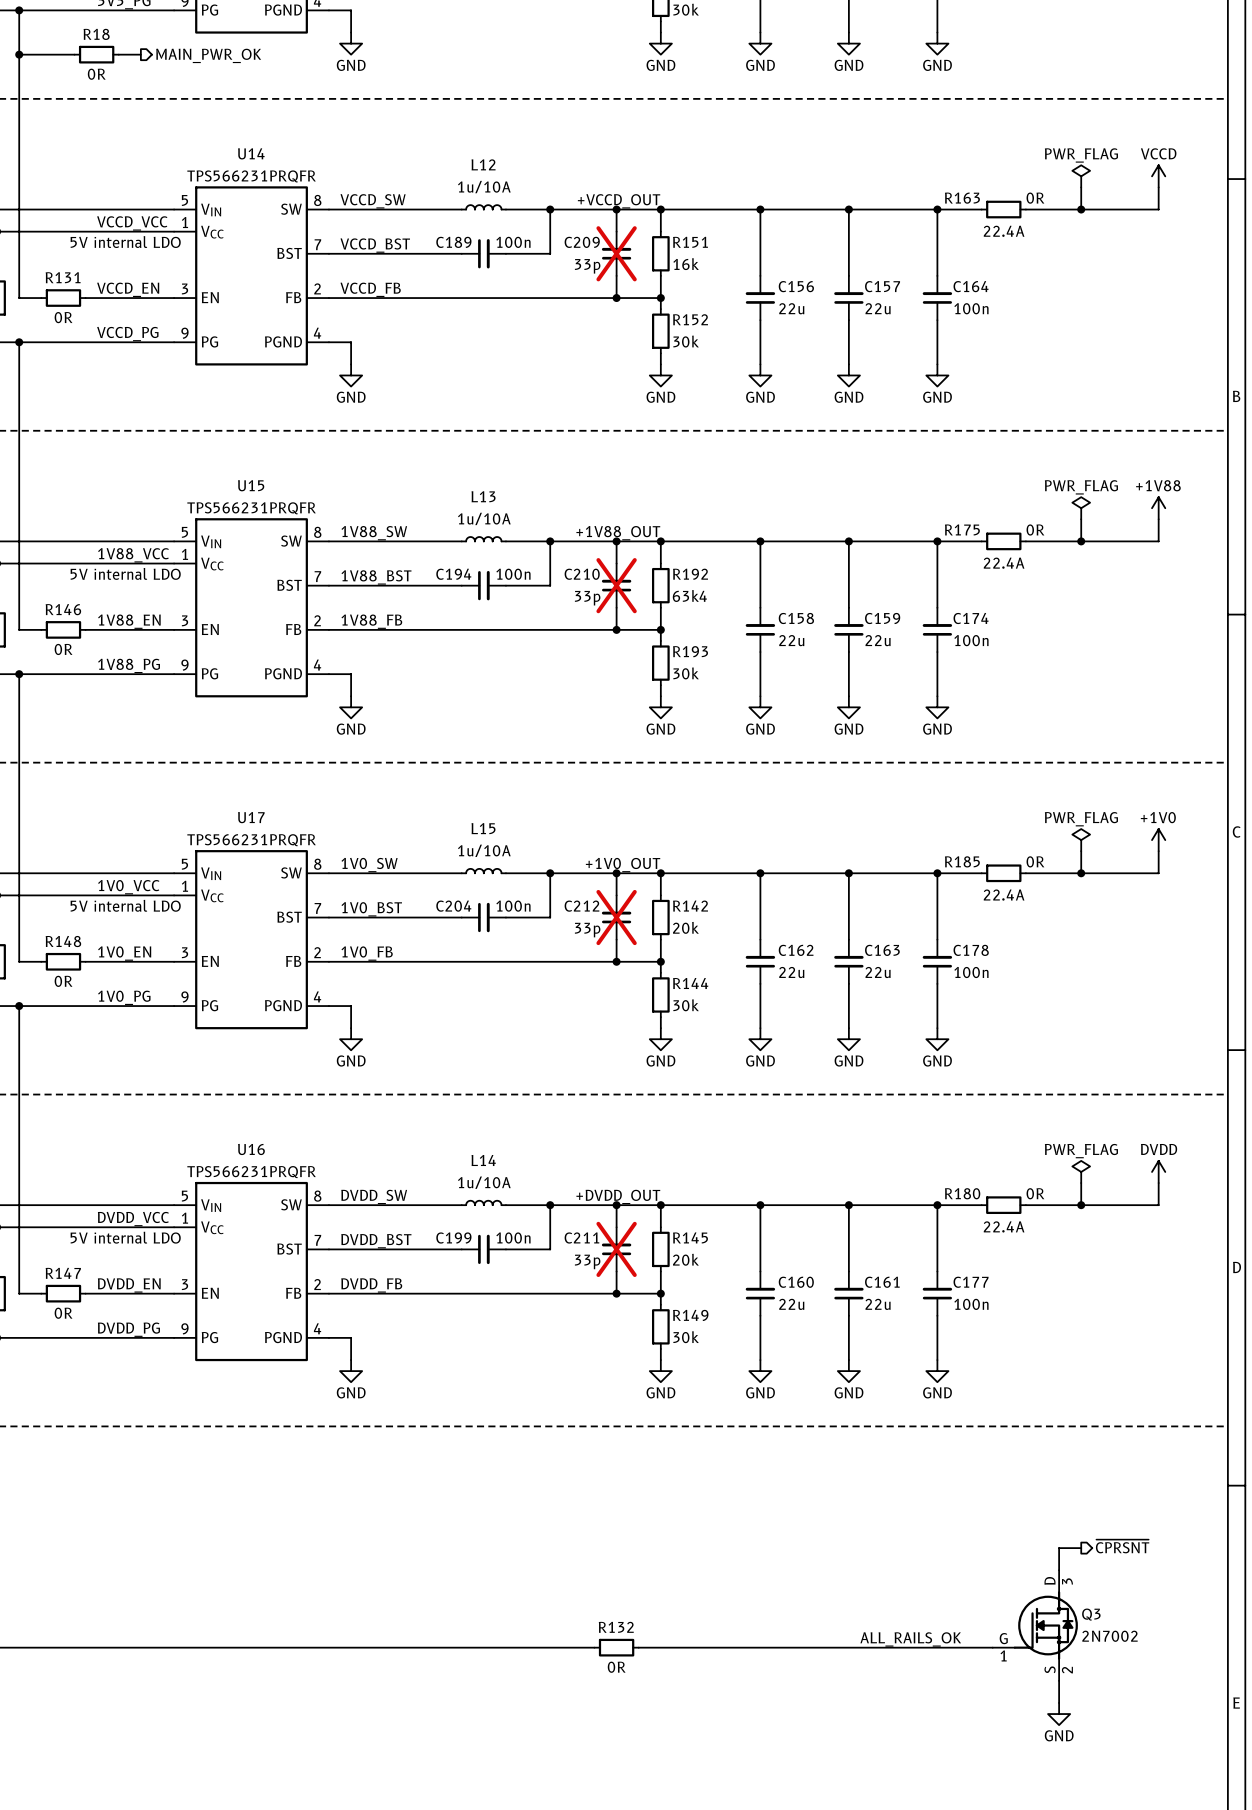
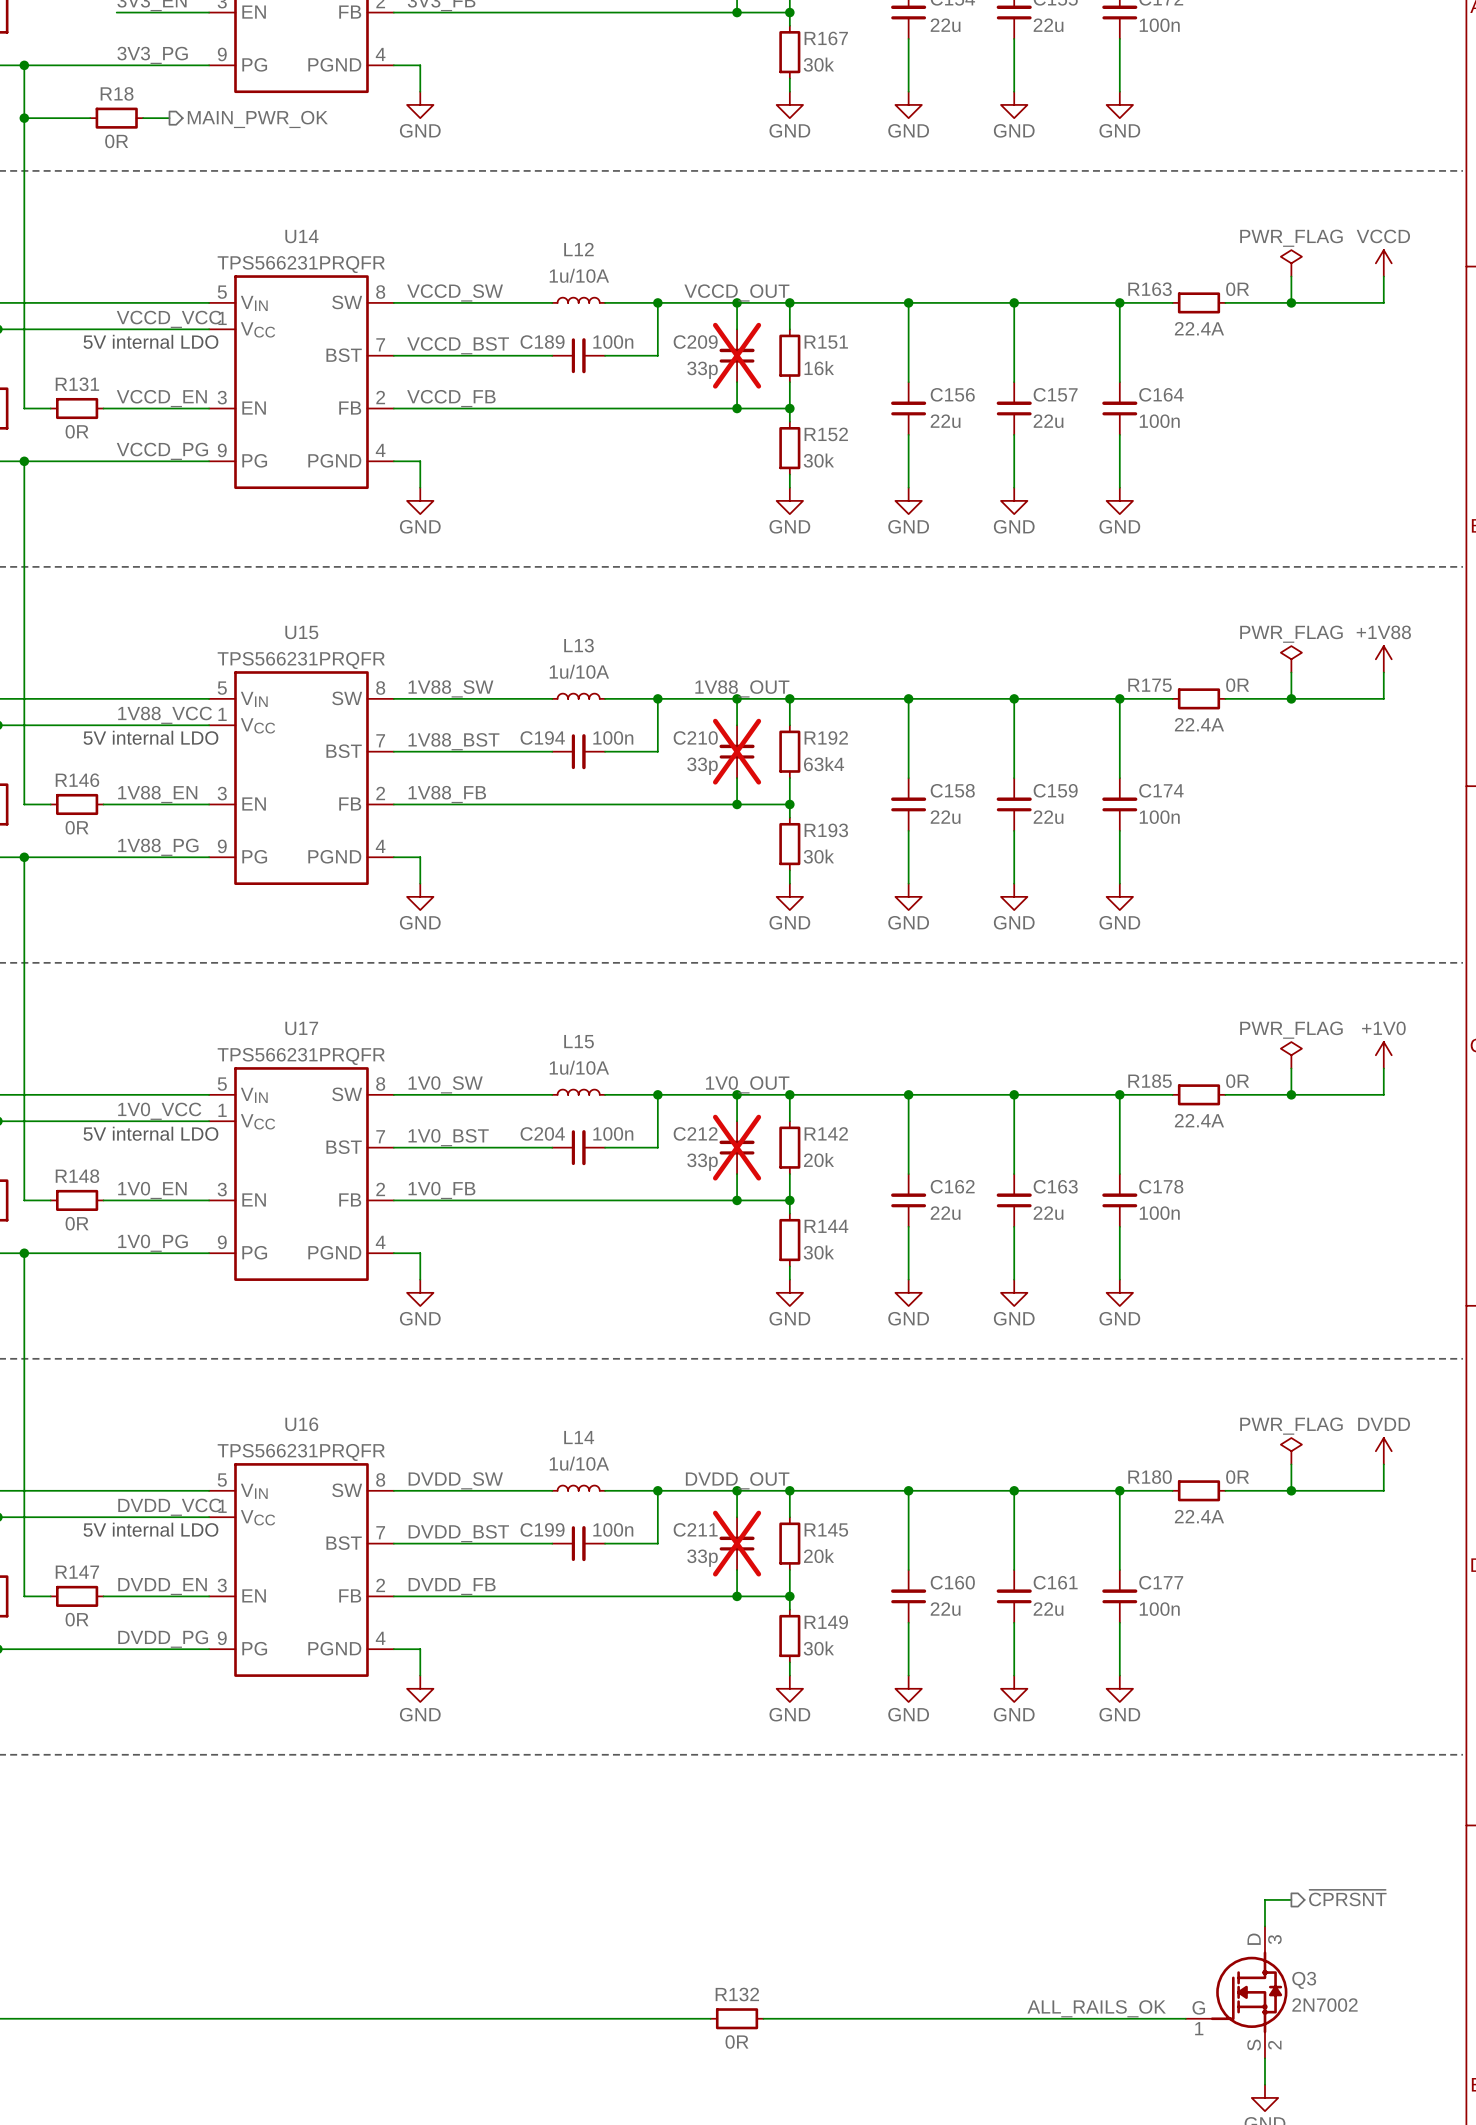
label: +VCCD_OUT (619, 201) -> VCCD_OUT (736, 292)
label: +1V88_OUT (618, 533) -> 1V88_OUT (742, 688)
label: +1V0_OUT (623, 865) -> 1V0_OUT (747, 1084)
label: +DVDD_OUT (618, 1196) -> DVDD_OUT (737, 1480)

